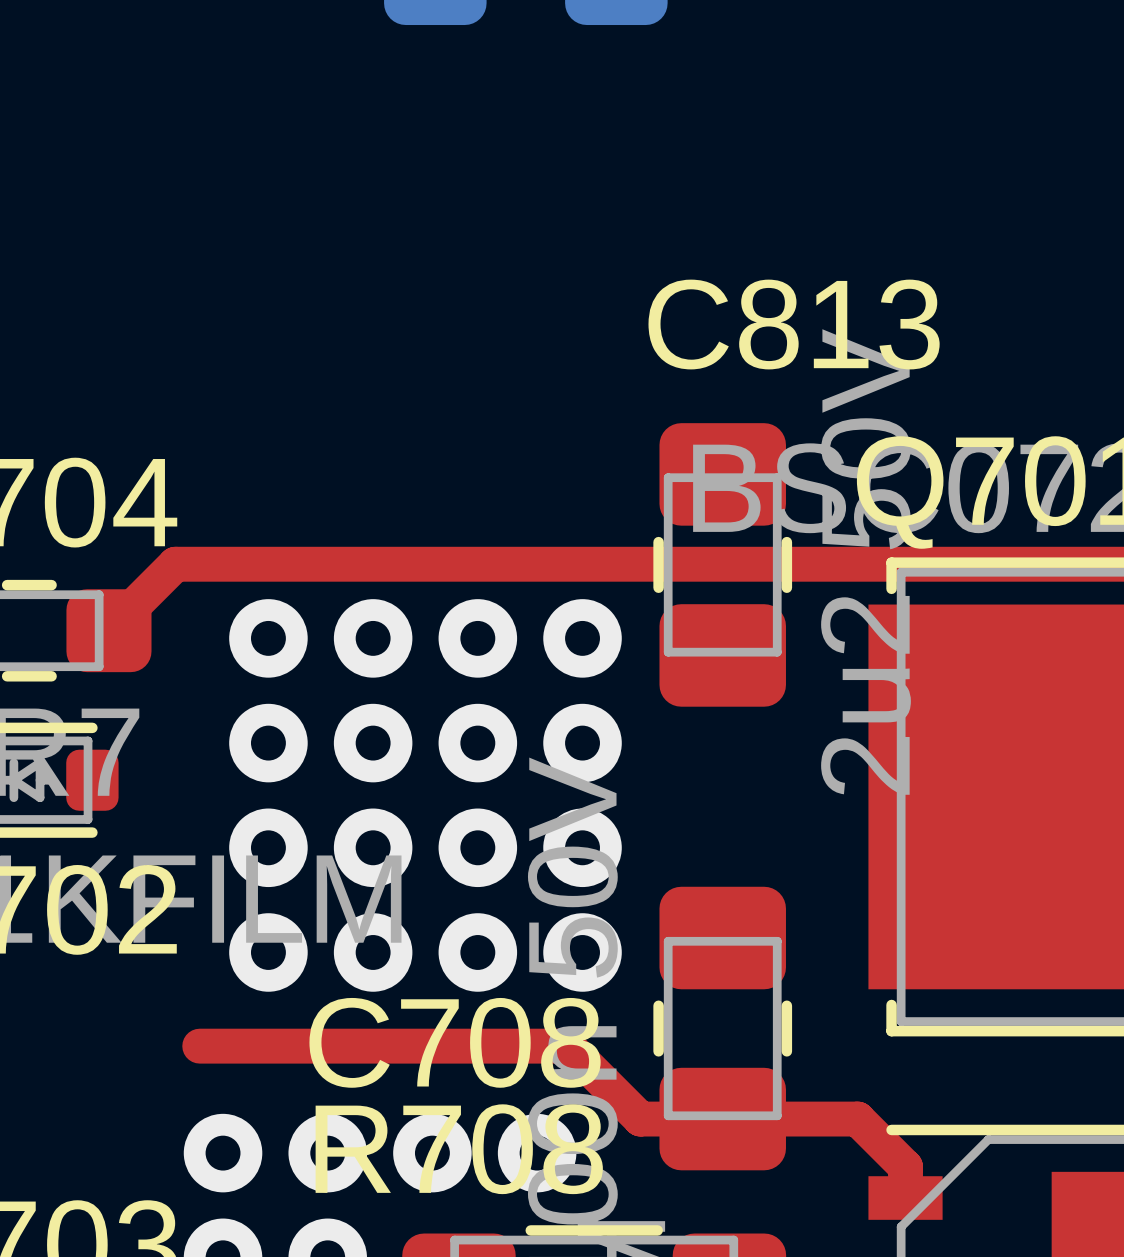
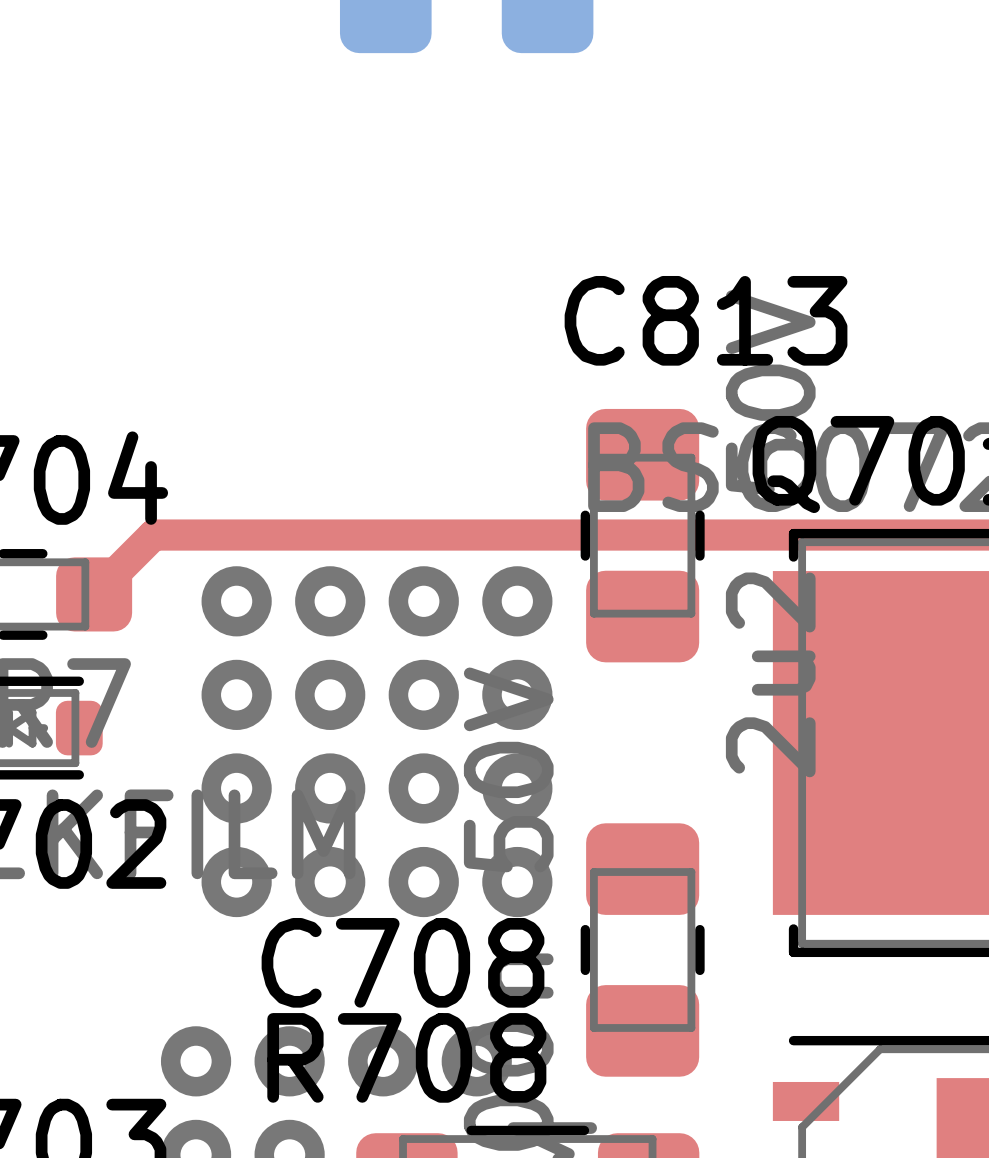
top track: (199, 1046) (567, 1046) (640, 1119) (857, 1119) (905, 1166) (905, 1198) -> none

